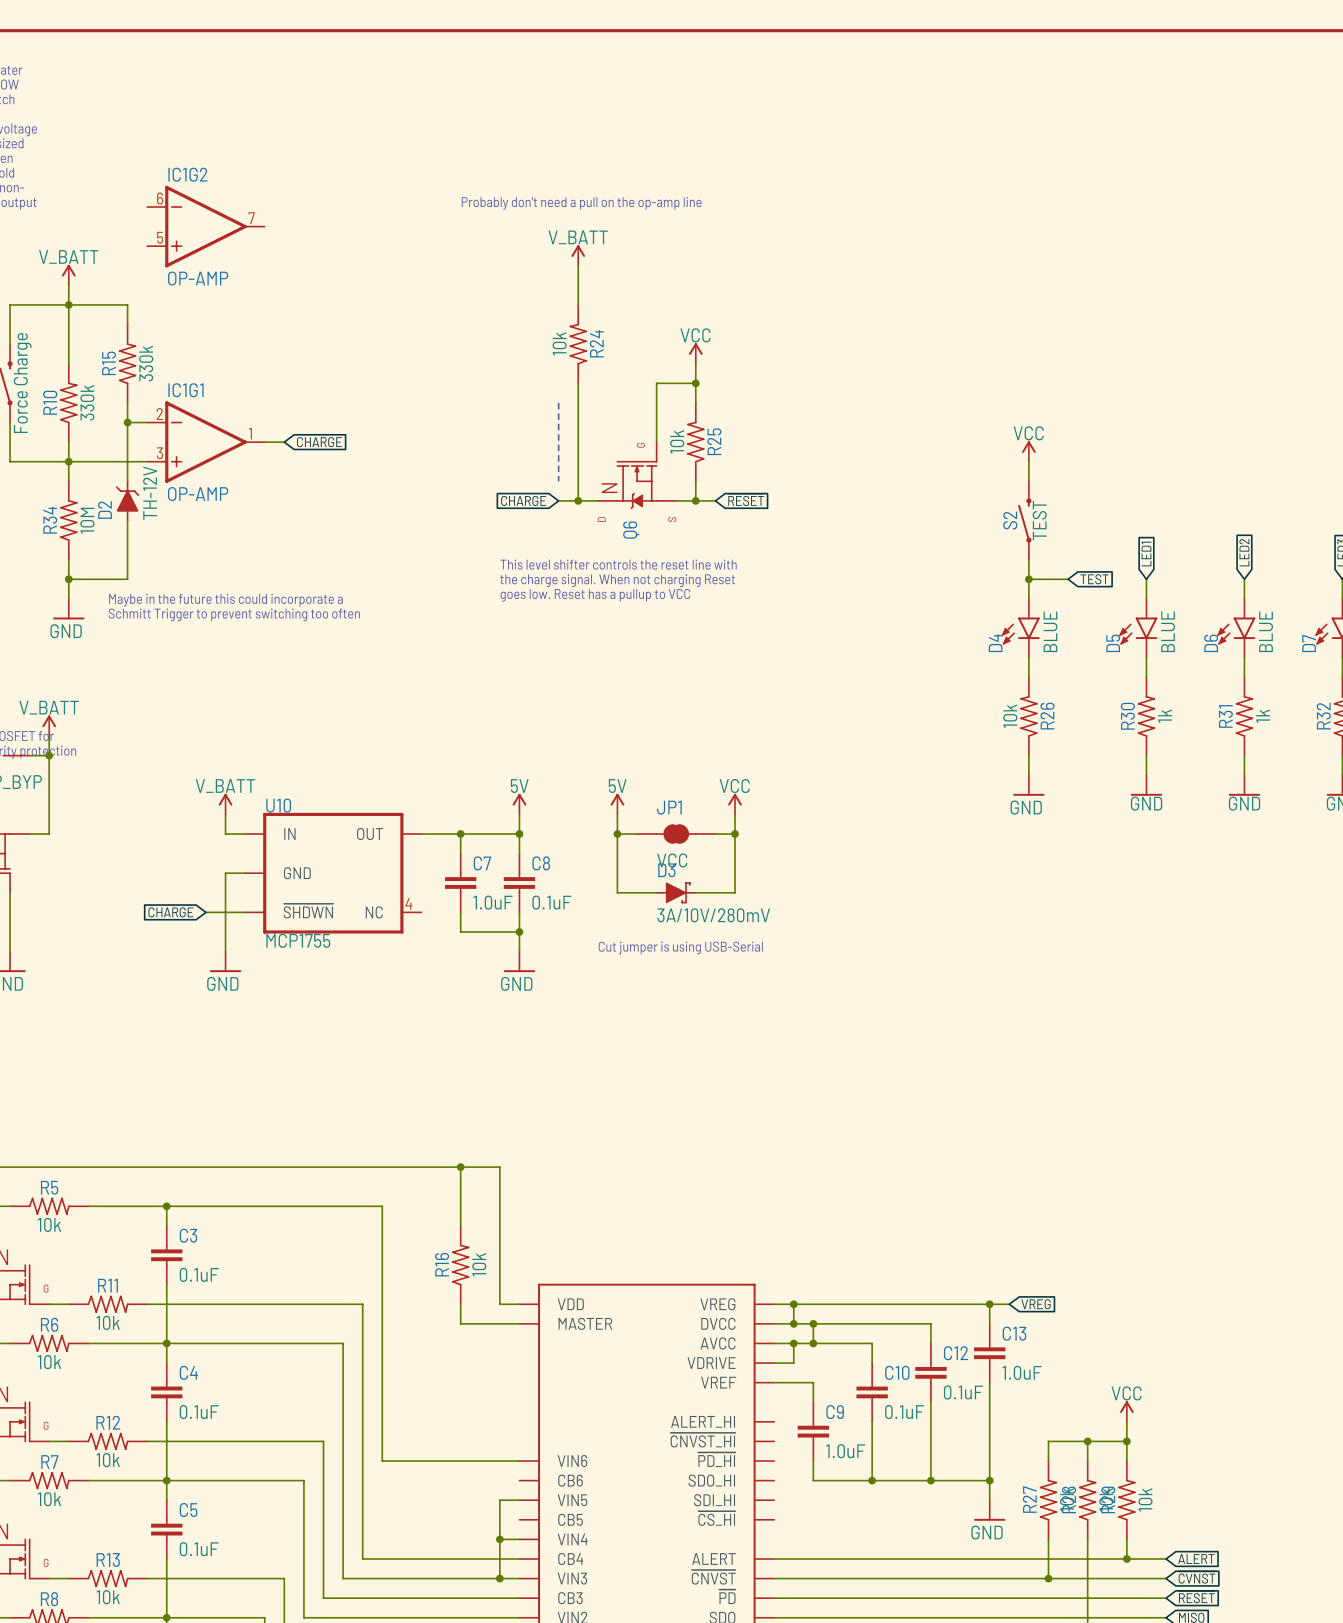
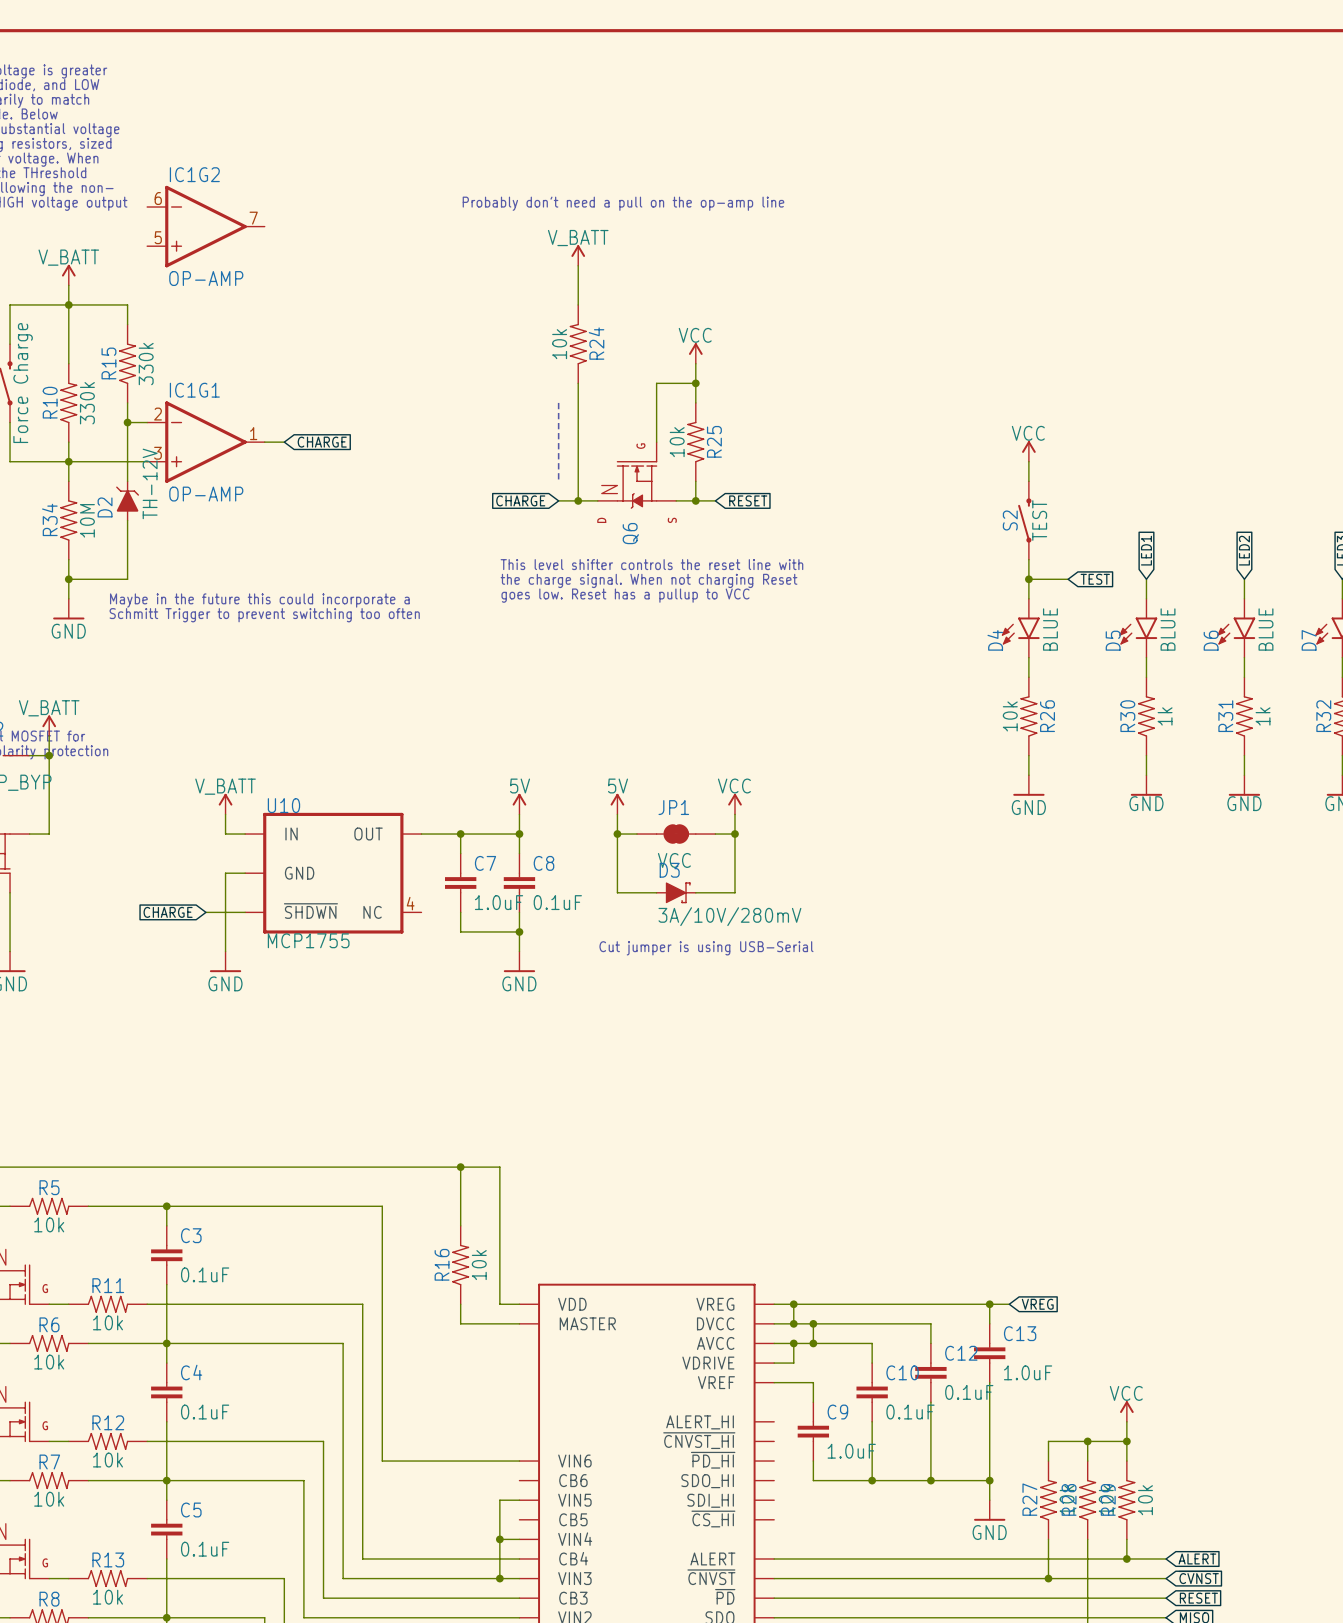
global label: ~{RESET} (746, 499) -> RESET (748, 500)
global label: ~{RESET} (1196, 1597) -> RESET (1198, 1598)

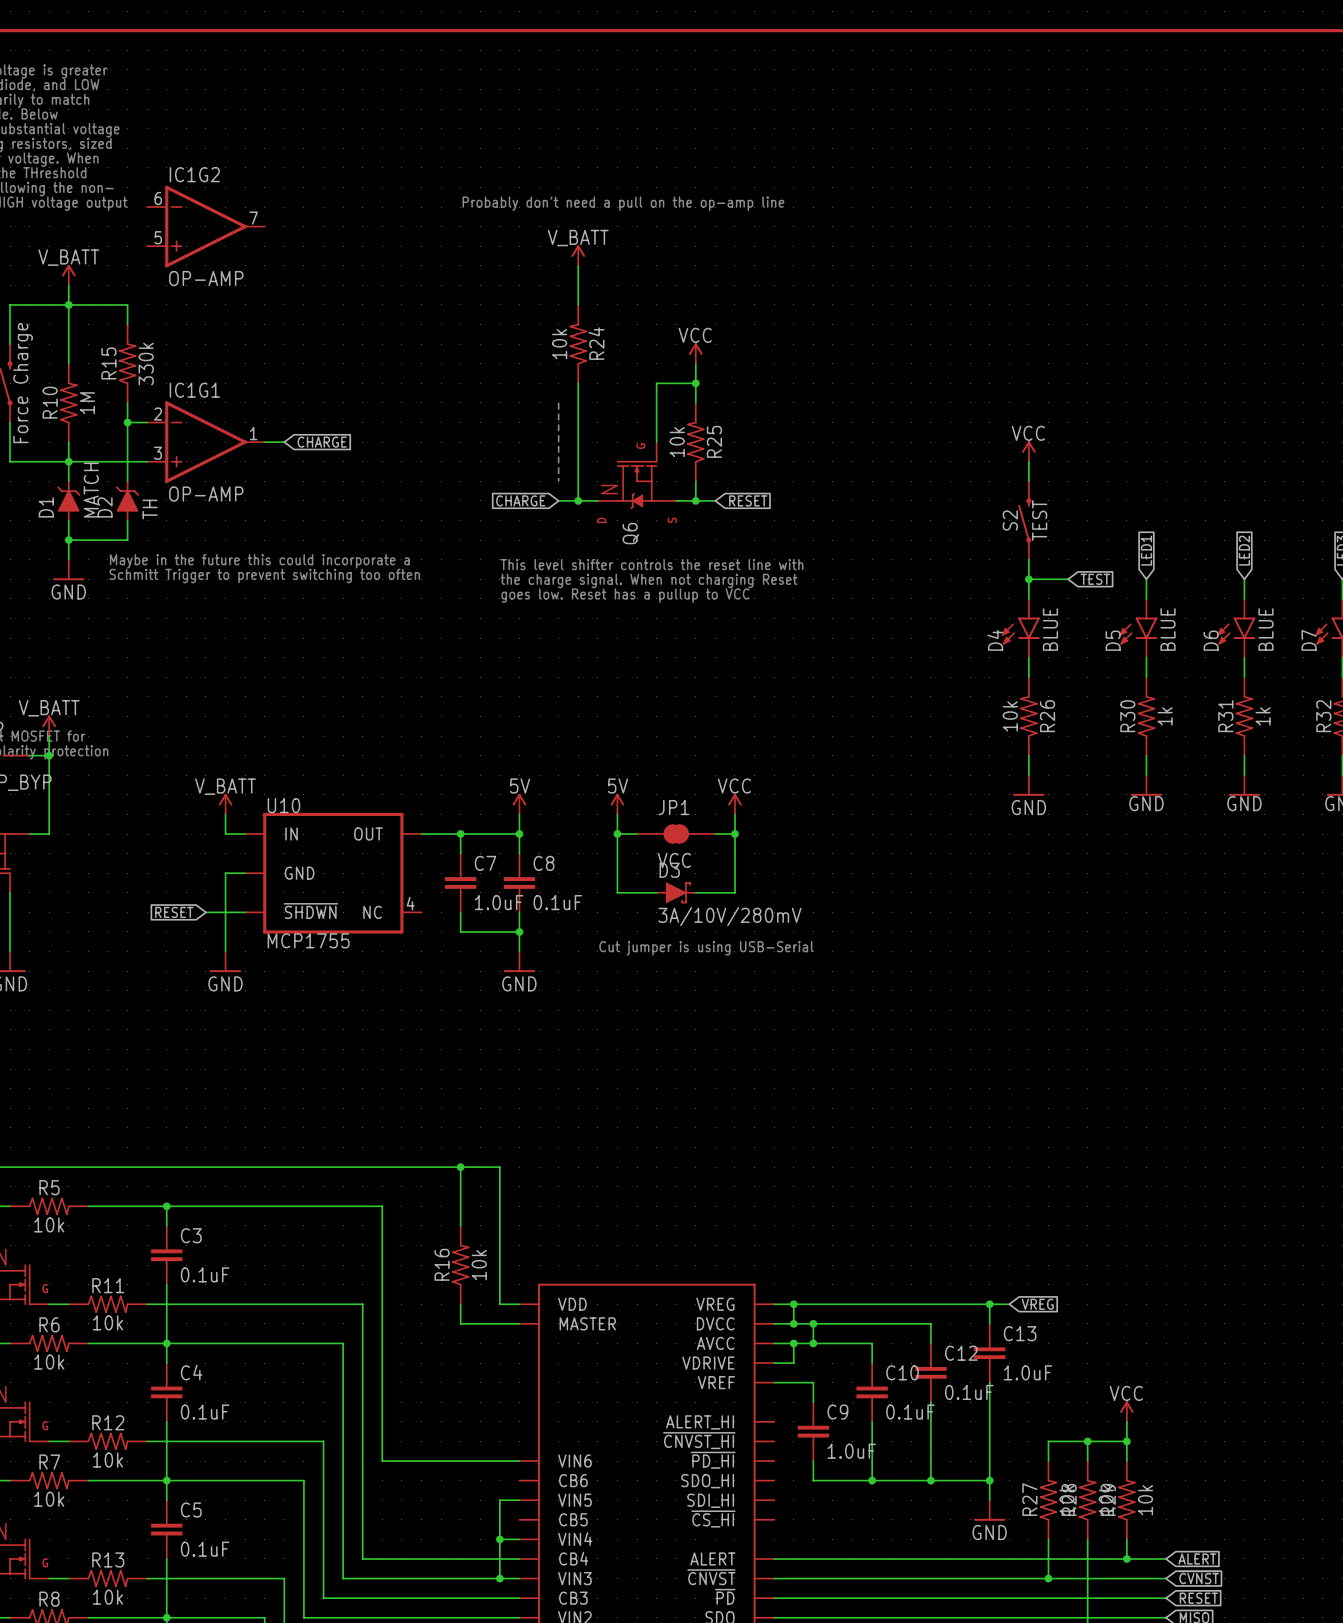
R10 value: 330k (87, 403) -> 1M (87, 403)
D2 value: TH-12V (150, 483) -> TH (150, 509)
D1: none -> MATCH (68, 500)
R34: 10M (68, 520) -> none
wire: (127, 540) (127, 579) (68, 579) -> (127, 540) (68, 540)
junction position: (68, 579) -> (68, 540)
text position: Maybe in the future this could incorporate a (259, 600) -> Maybe in the future this could incorporate a (259, 561)
power symbol position: GND (68, 609) -> GND (68, 569)
text position: Schmitt Trigger to prevent switching too often (264, 615) -> Schmitt Trigger to prevent switching too often (264, 576)
global label: CHARGE (168, 912) -> RESET (174, 912)

